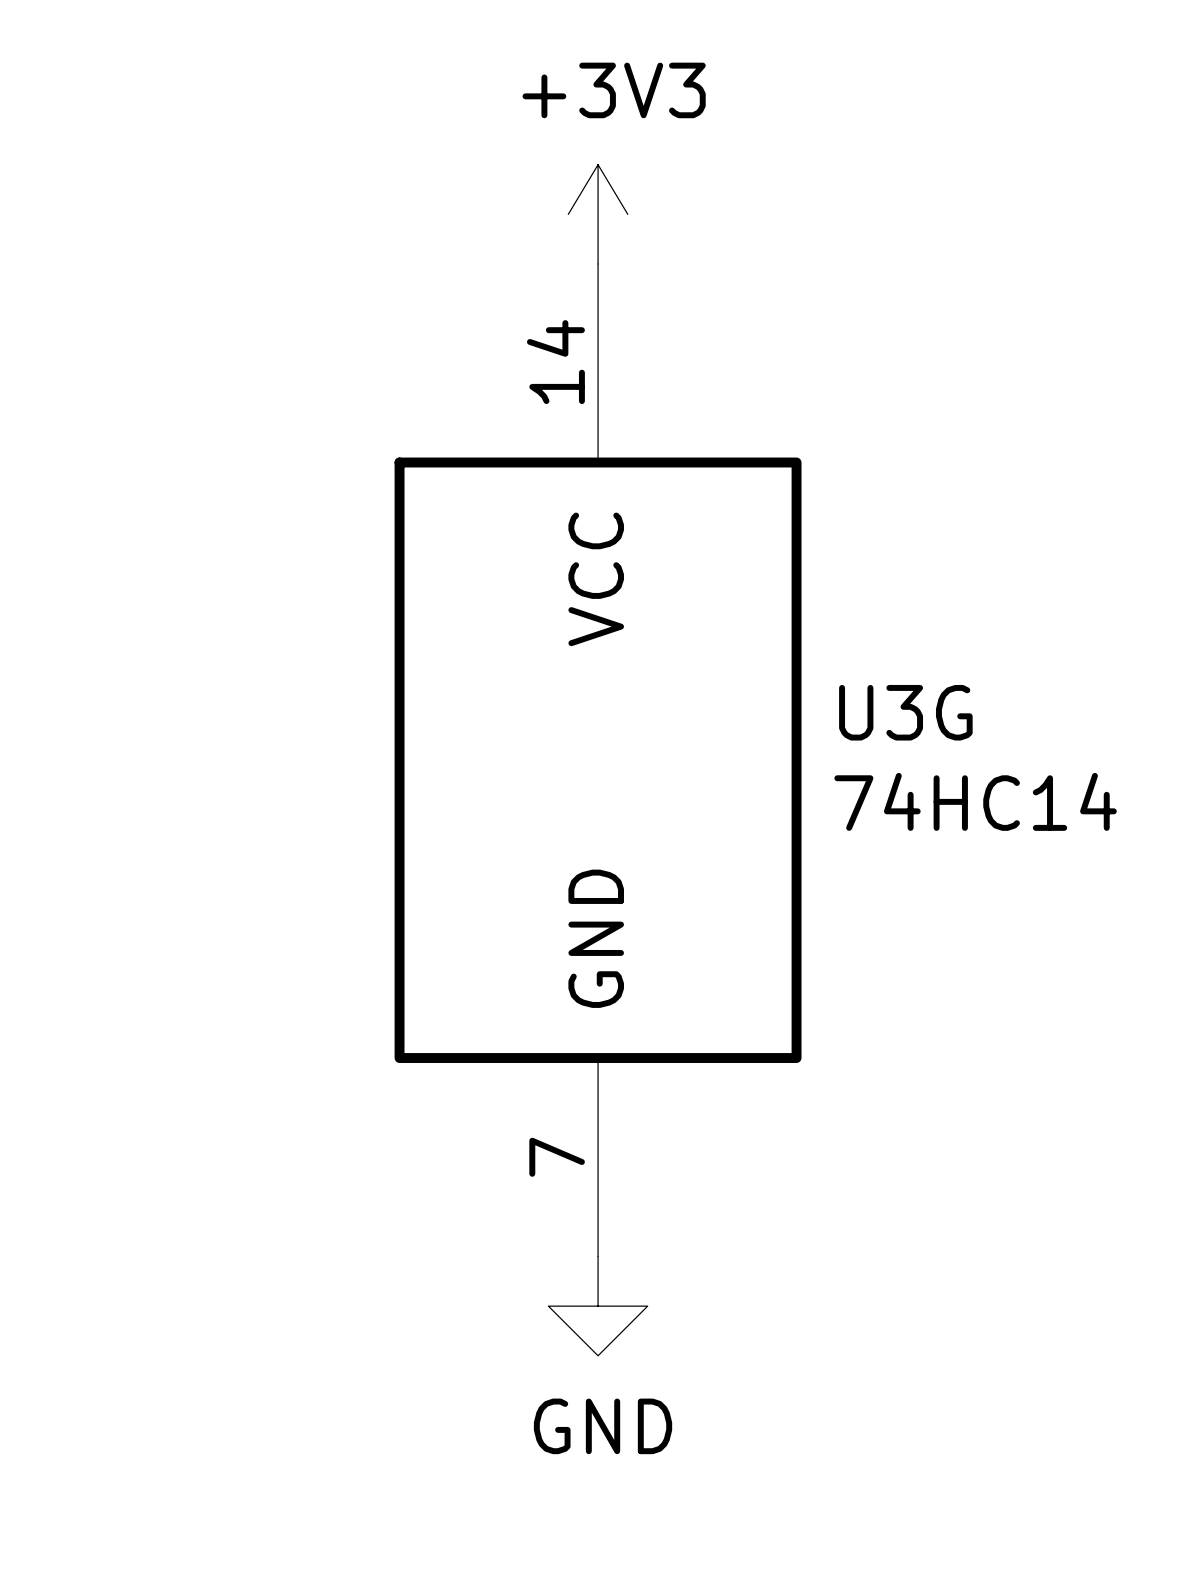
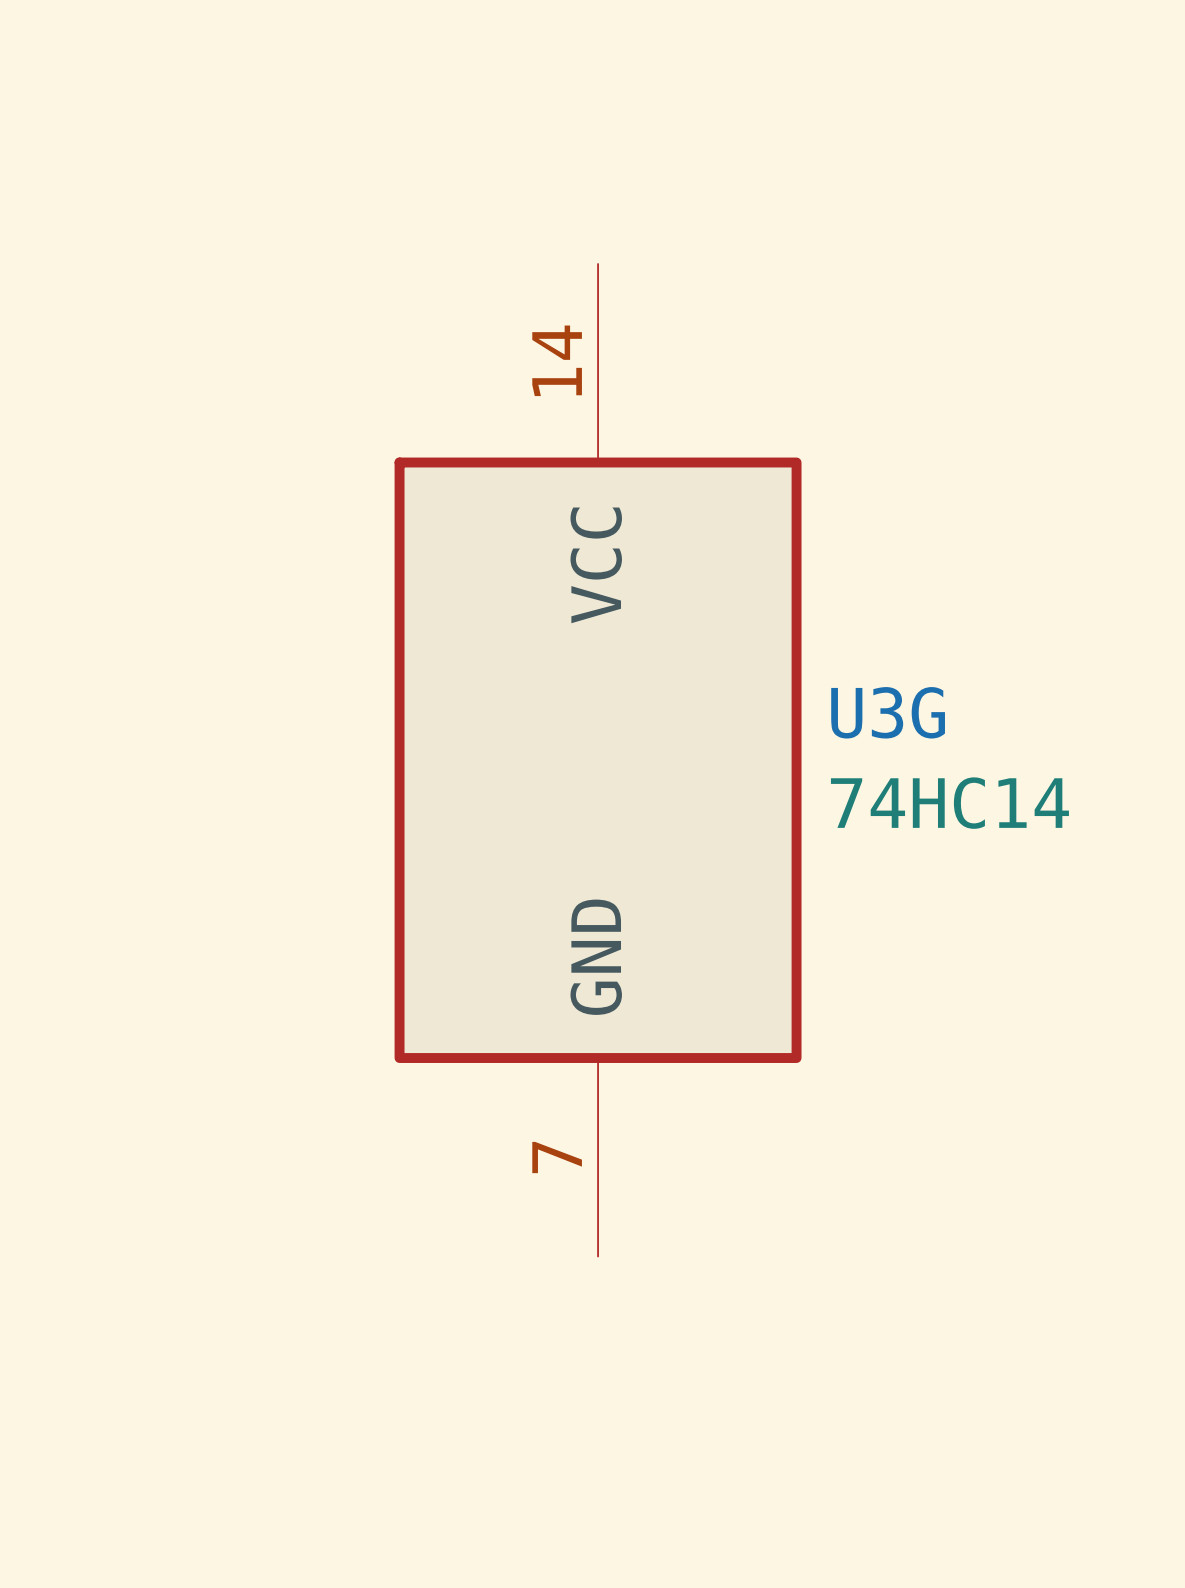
power symbol: +3V3 (598, 214) -> none
power symbol: GND (598, 1306) -> none

